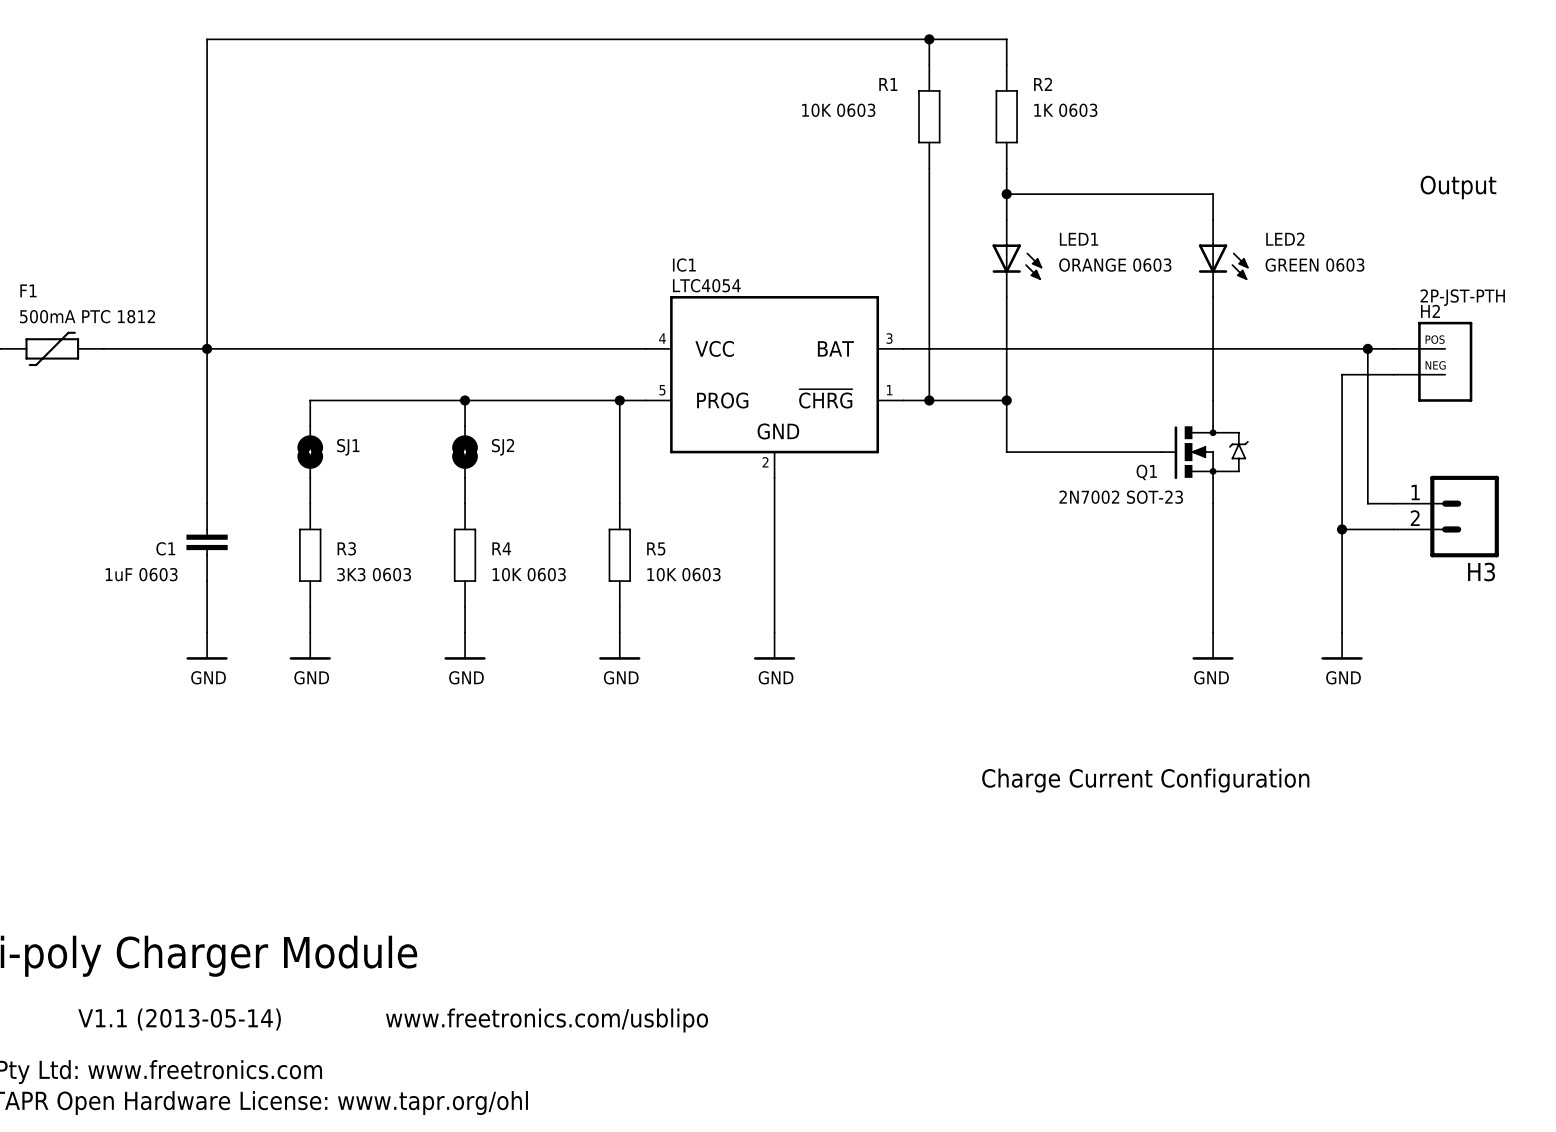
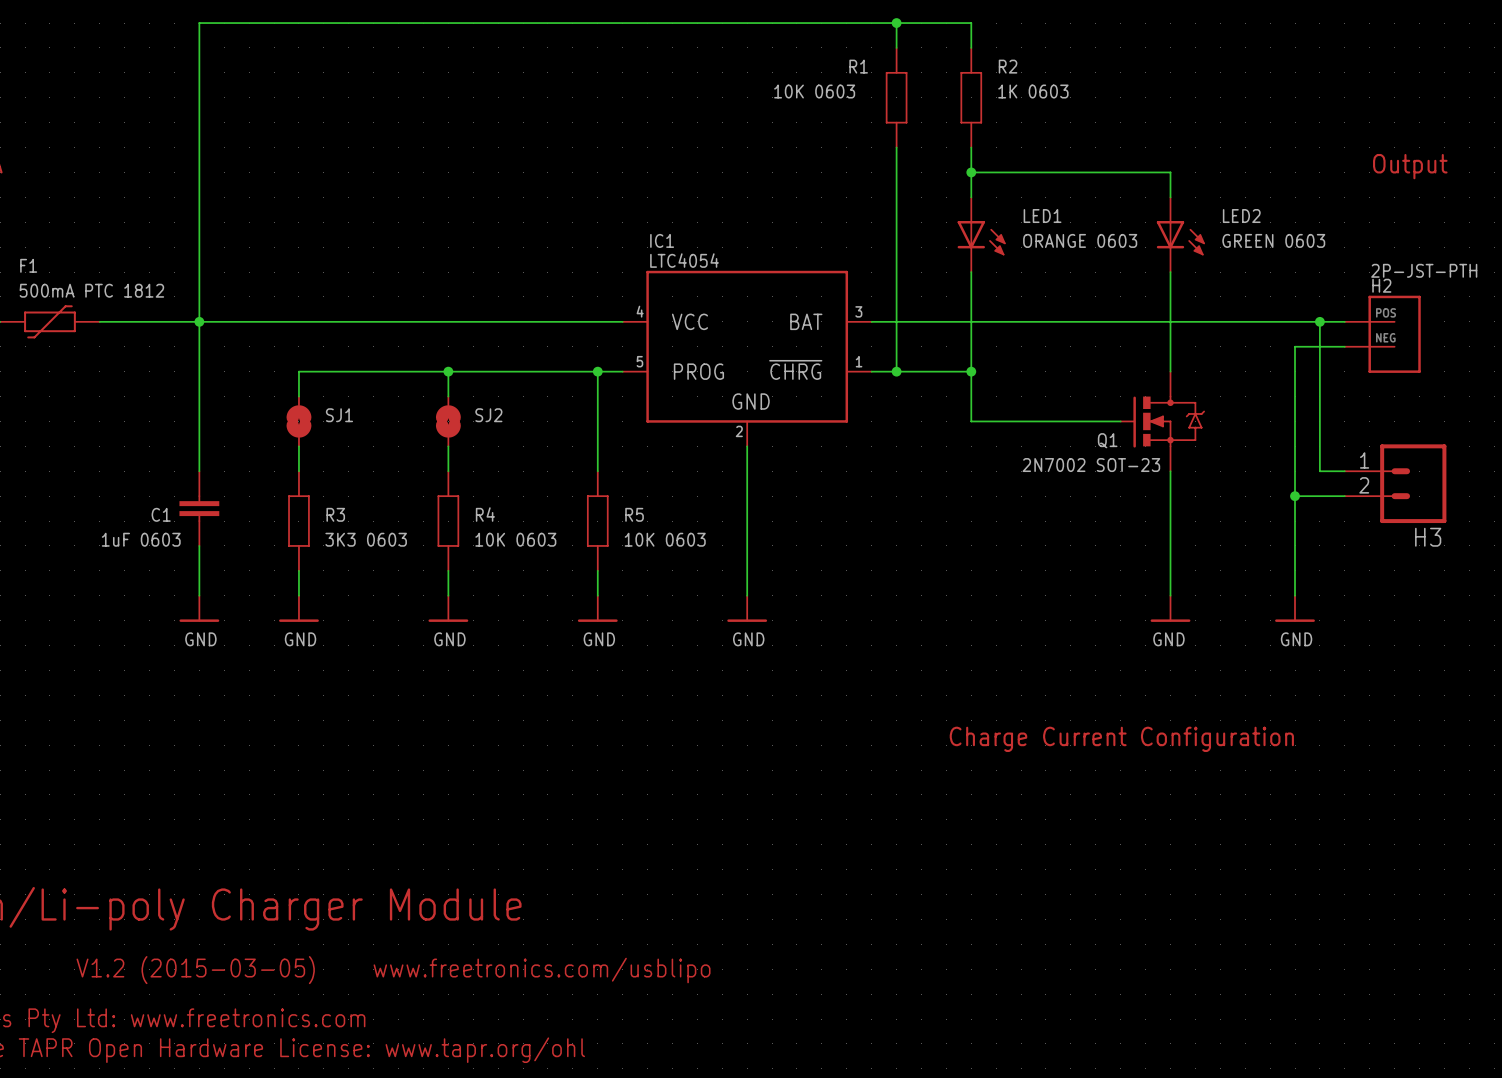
text: V1.1 (2013-05-14) (179, 1019) -> V1.2 (2015-03-05) (195, 970)

